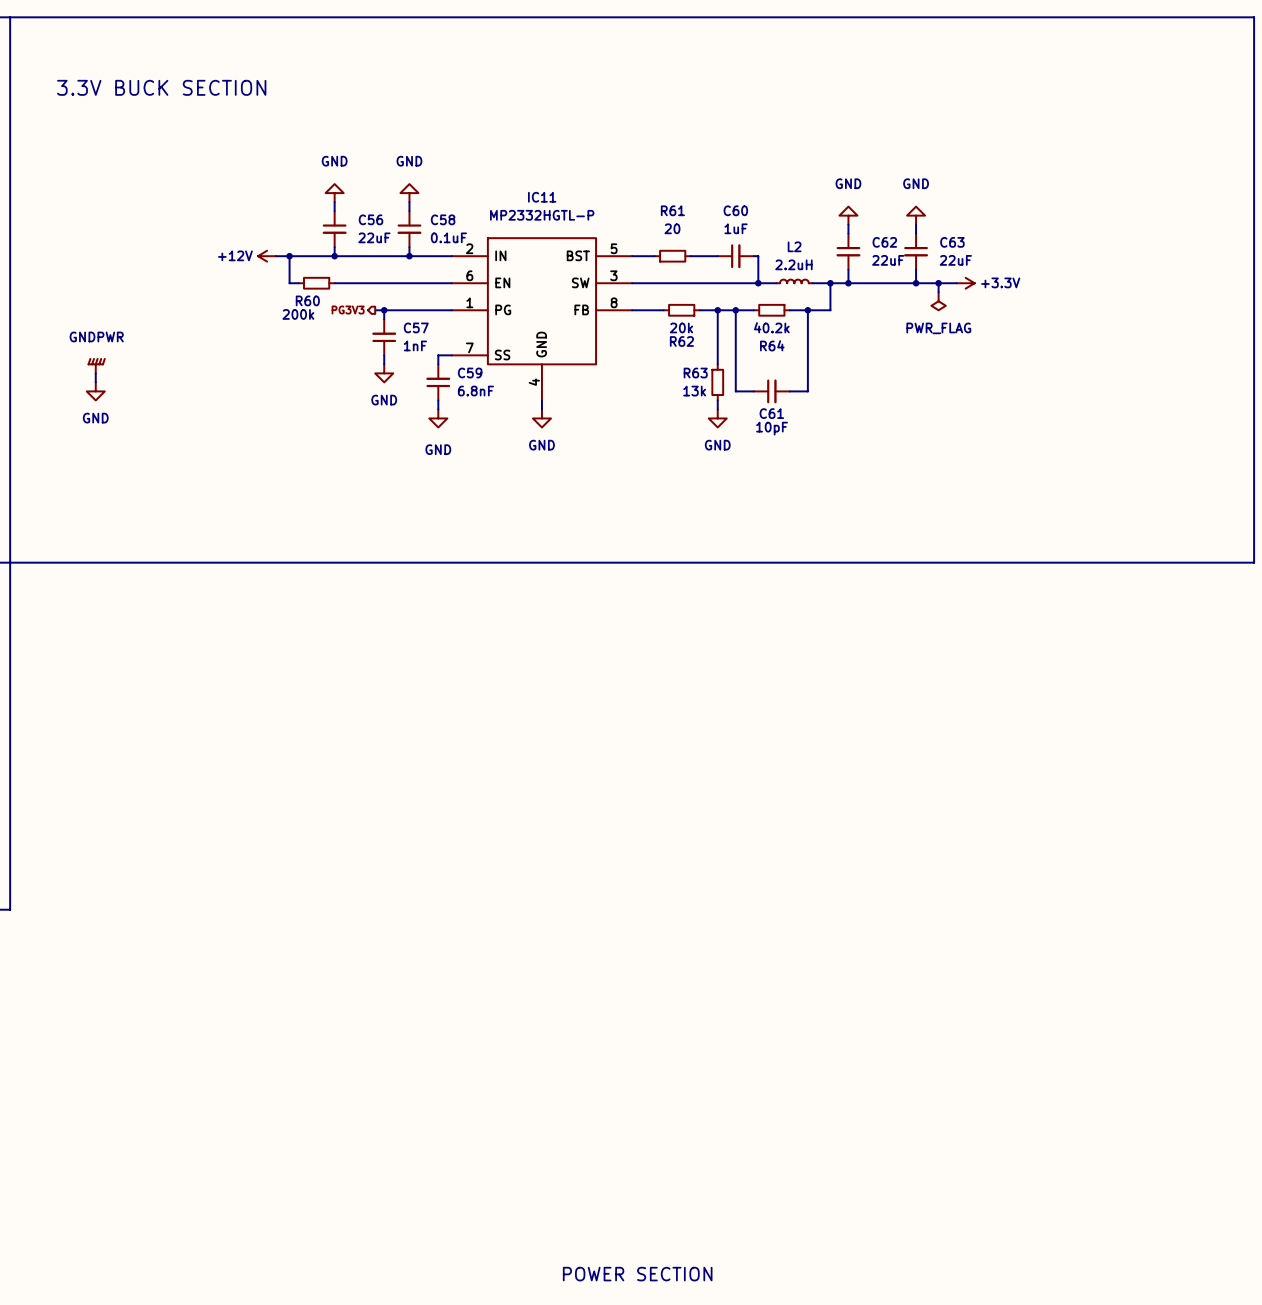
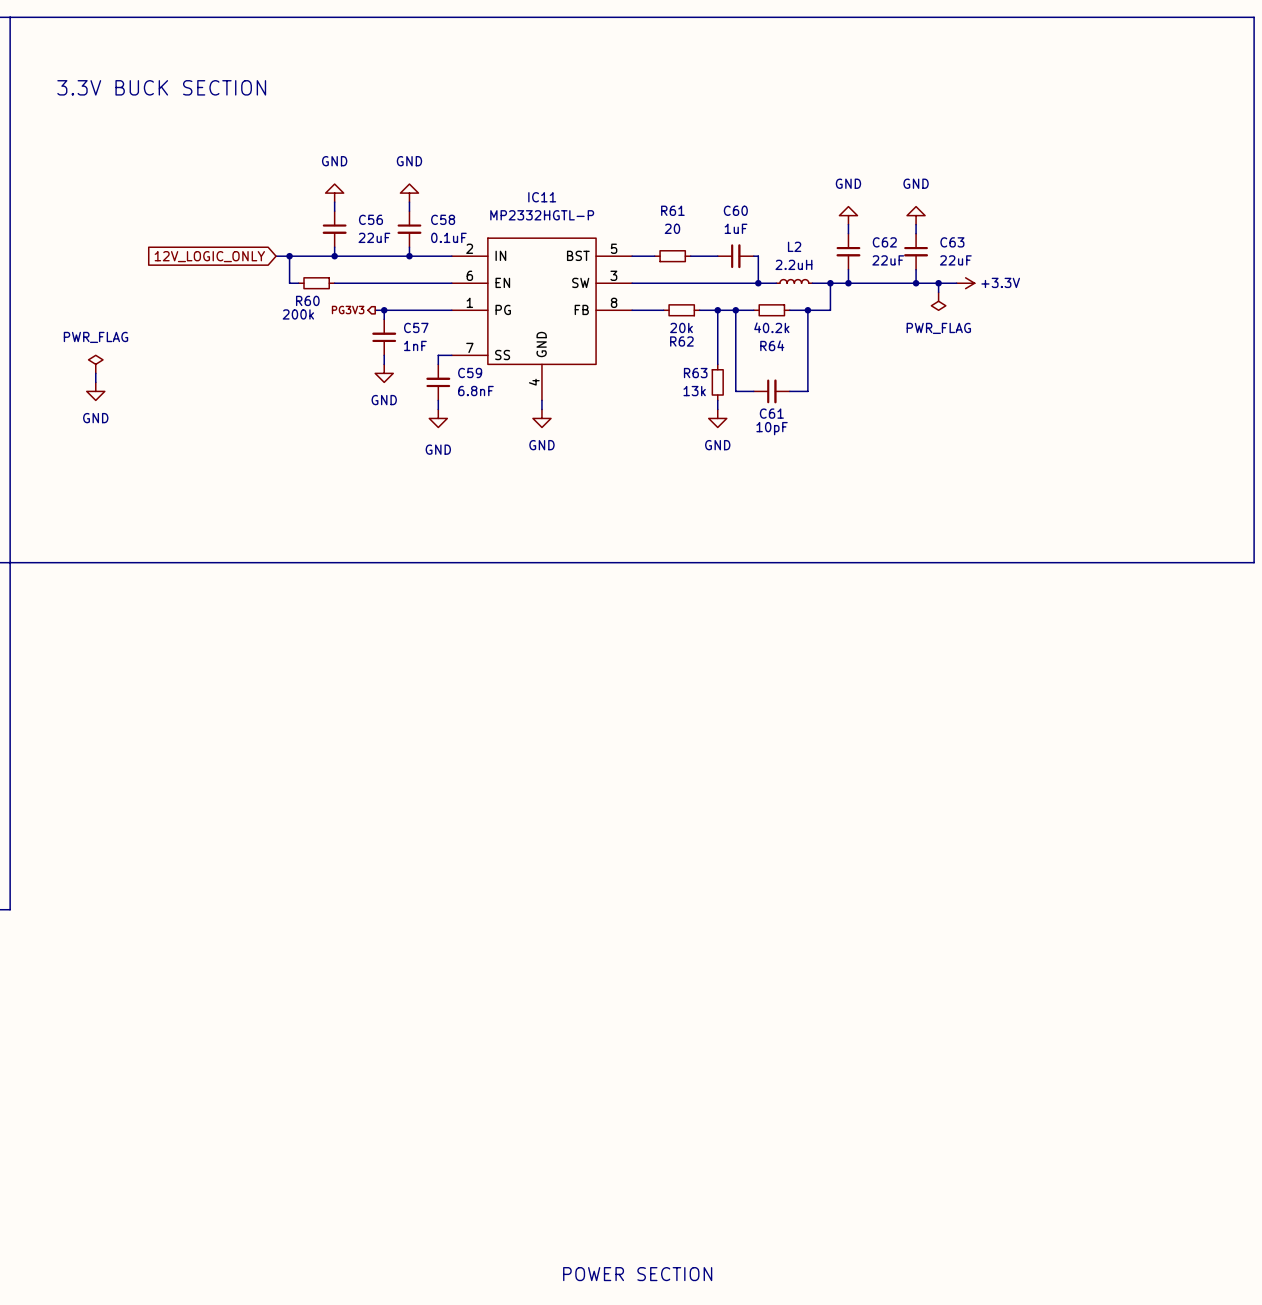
global label: none -> 12V_LOGIC_ONLY (209, 256)
power symbol: +12V (267, 256) -> none
power symbol: GNDPWR (96, 365) -> PWR_FLAG (95, 364)

